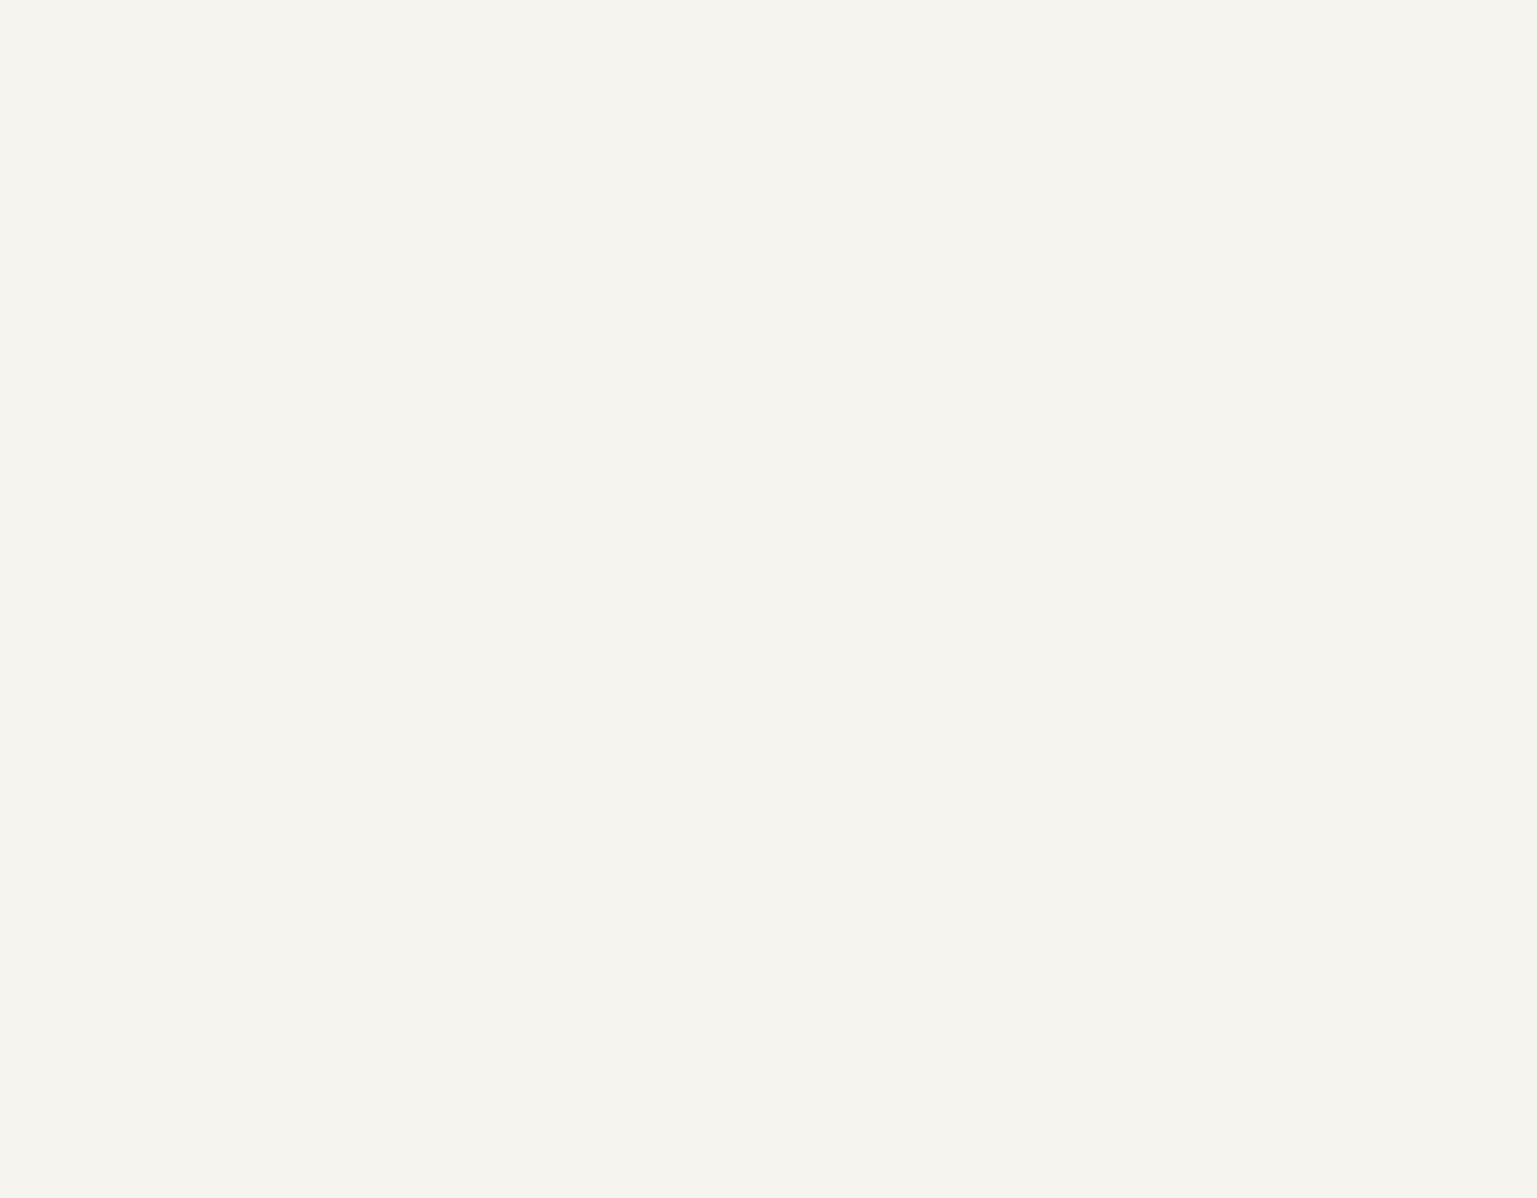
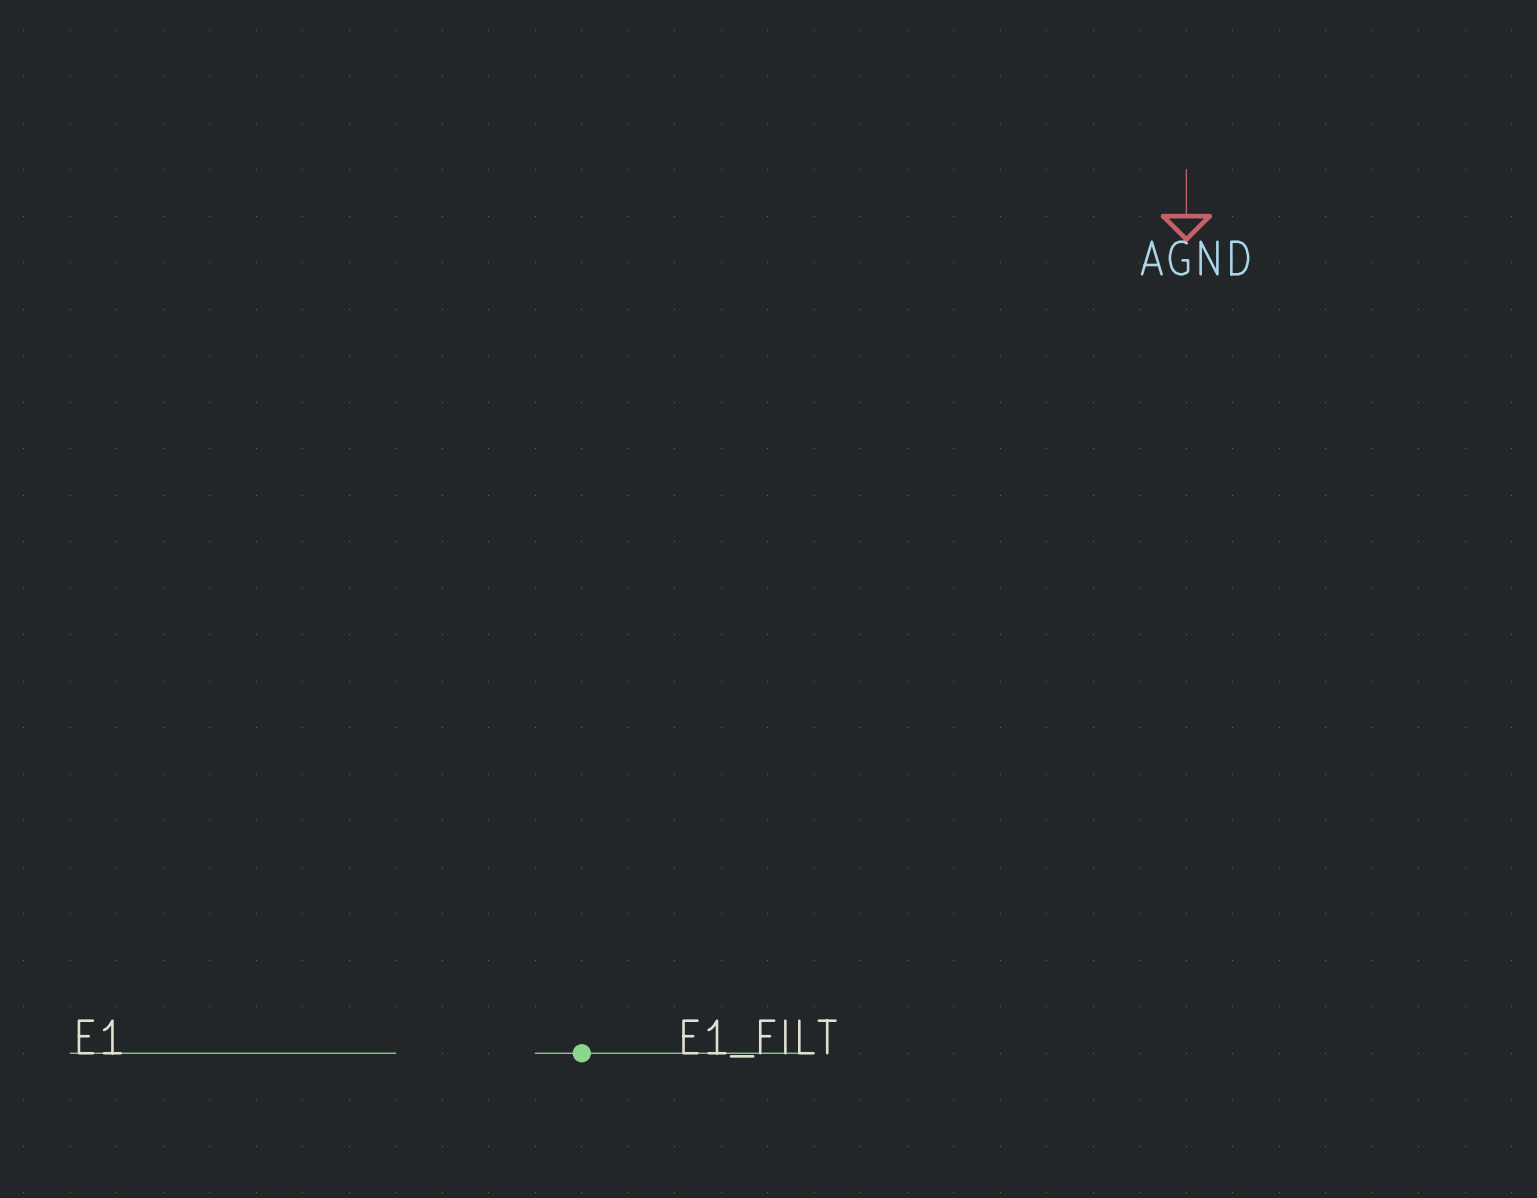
power symbol: none -> AGND (1186, 205)
label: none -> E1 (99, 1036)
label: none -> E1_FILT (759, 1038)
wire: none -> (70, 1053) (395, 1053)
wire: none -> (535, 1053) (814, 1053)
junction: none -> (581, 1053)

